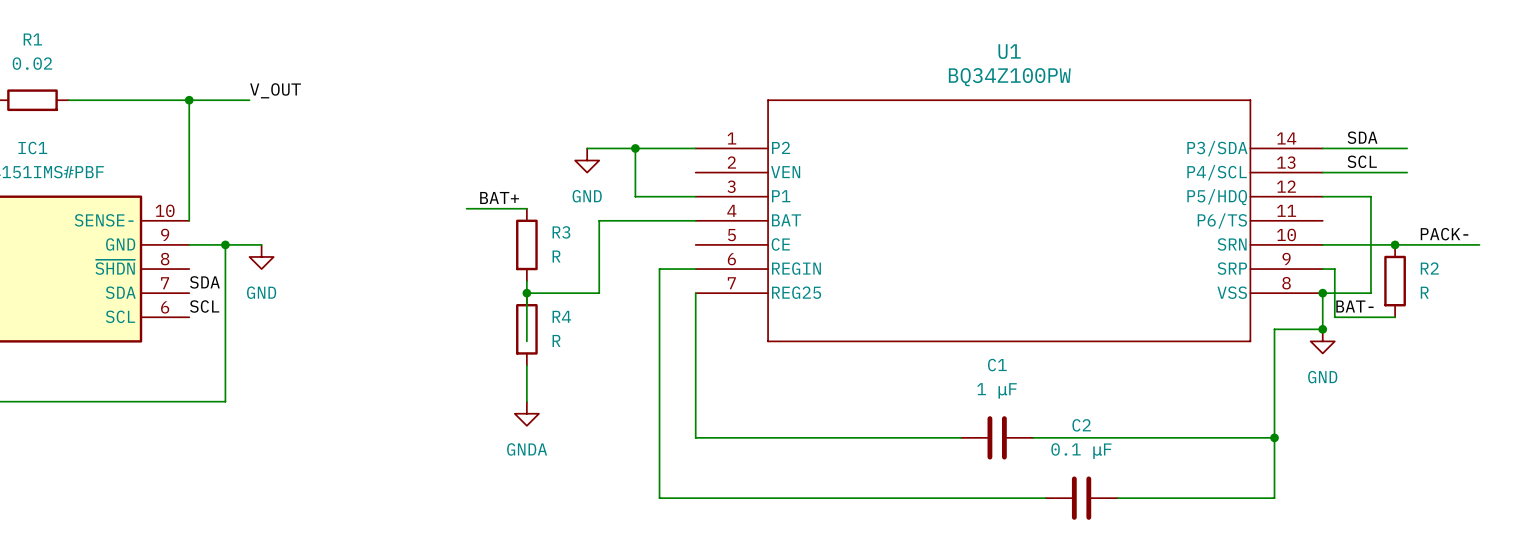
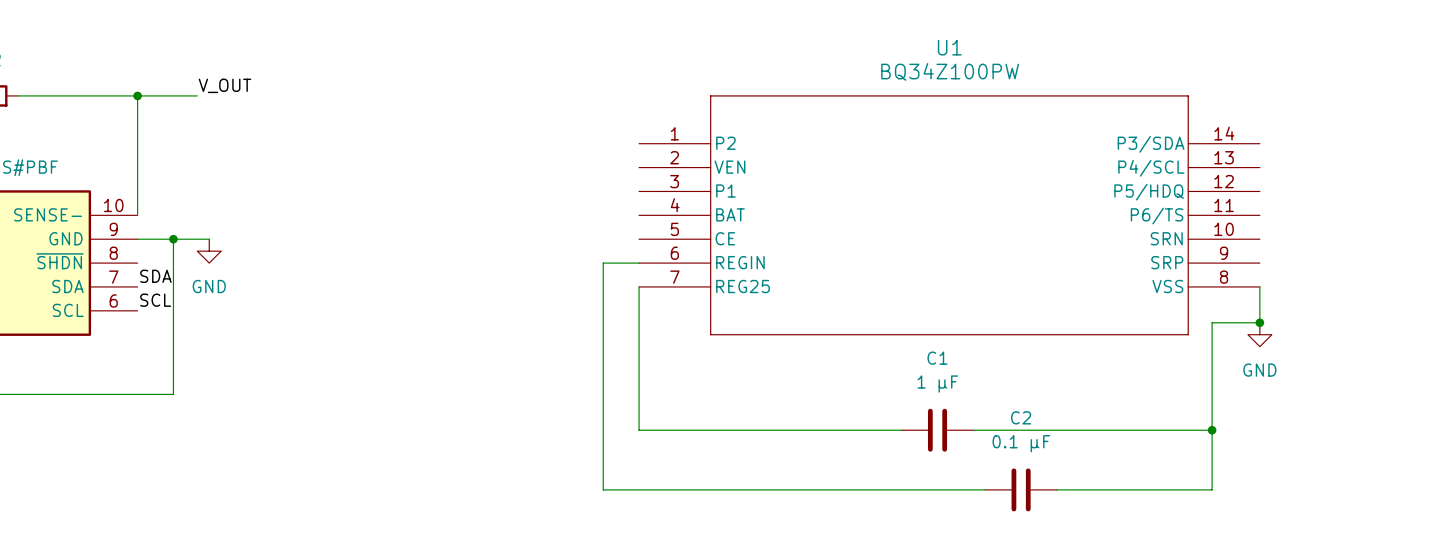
label: SDA (1362, 137) -> none
wire: (587, 148) (695, 148) -> none
wire: (635, 148) (635, 196) (695, 196) -> none
junction: (635, 148) -> none
wire: (1322, 148) (1407, 148) -> none
power symbol: GND (587, 160) -> none
label: SCL (1362, 161) -> none
wire: (1322, 172) (1407, 172) -> none
wire: (1322, 196) (1370, 196) (1370, 293) (1322, 293) -> none
label: BAT+ (499, 197) -> none
wire: (466, 208) (526, 208) -> none
wire: (695, 220) (599, 220) (599, 293) (526, 293) -> none
label: PACK- (1444, 234) -> none
R3: R (526, 244) -> none
wire: (1322, 244) (1479, 244) -> none
junction: (1395, 244) -> none
wire: (1322, 269) (1334, 269) (1334, 317) (1395, 317) -> none
wire: (526, 281) (526, 341) -> none
R2: R (1395, 281) -> none
junction: (526, 293) -> none
junction: (1322, 293) -> none
label: BAT- (1354, 306) -> none
R4: R (526, 329) -> none
wire: (526, 365) (526, 401) -> none
power symbol: GNDA (526, 413) -> none

